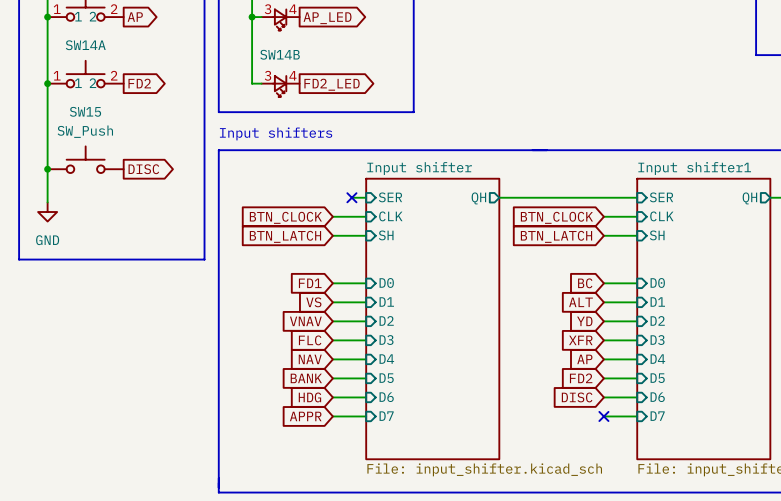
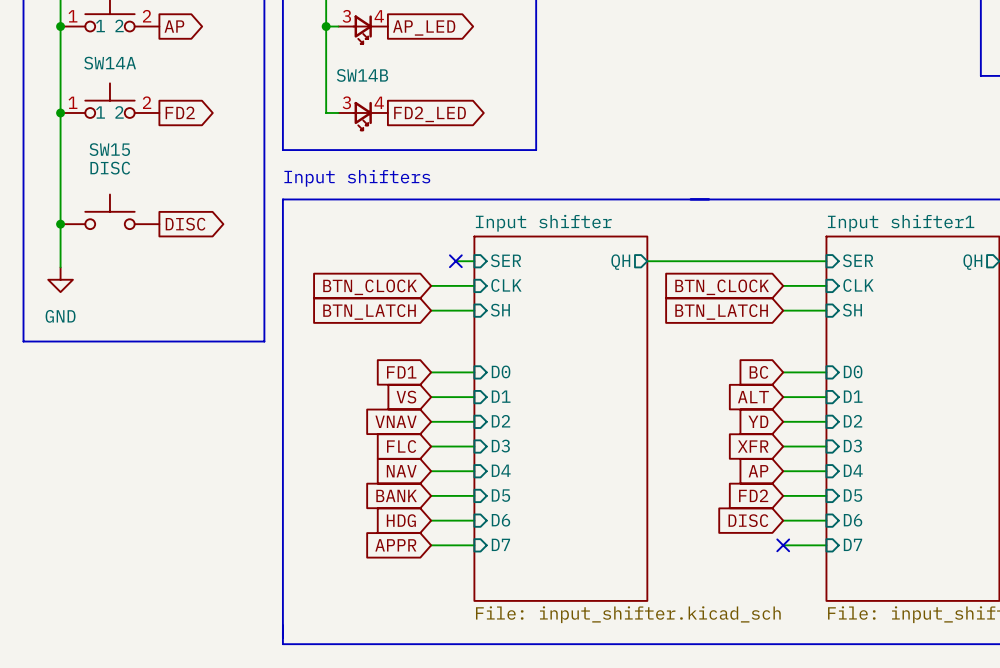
SW15 value: SW_Push (85, 131) -> DISC (110, 168)

